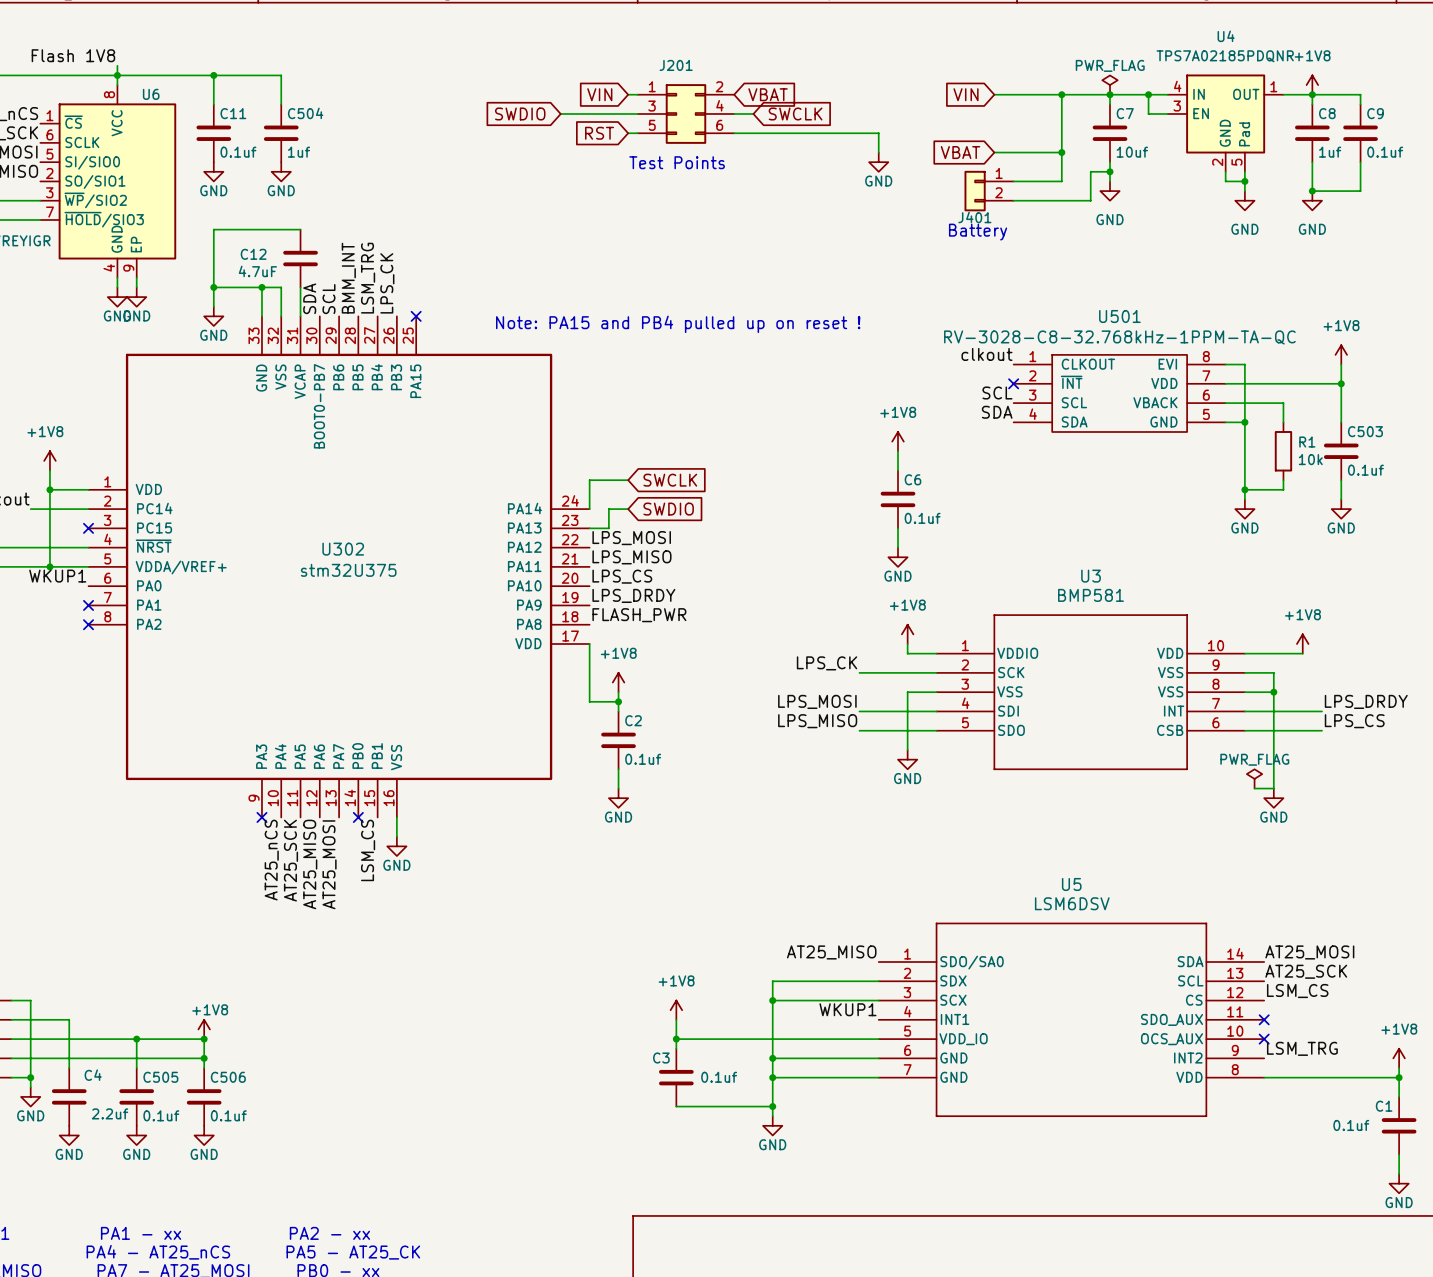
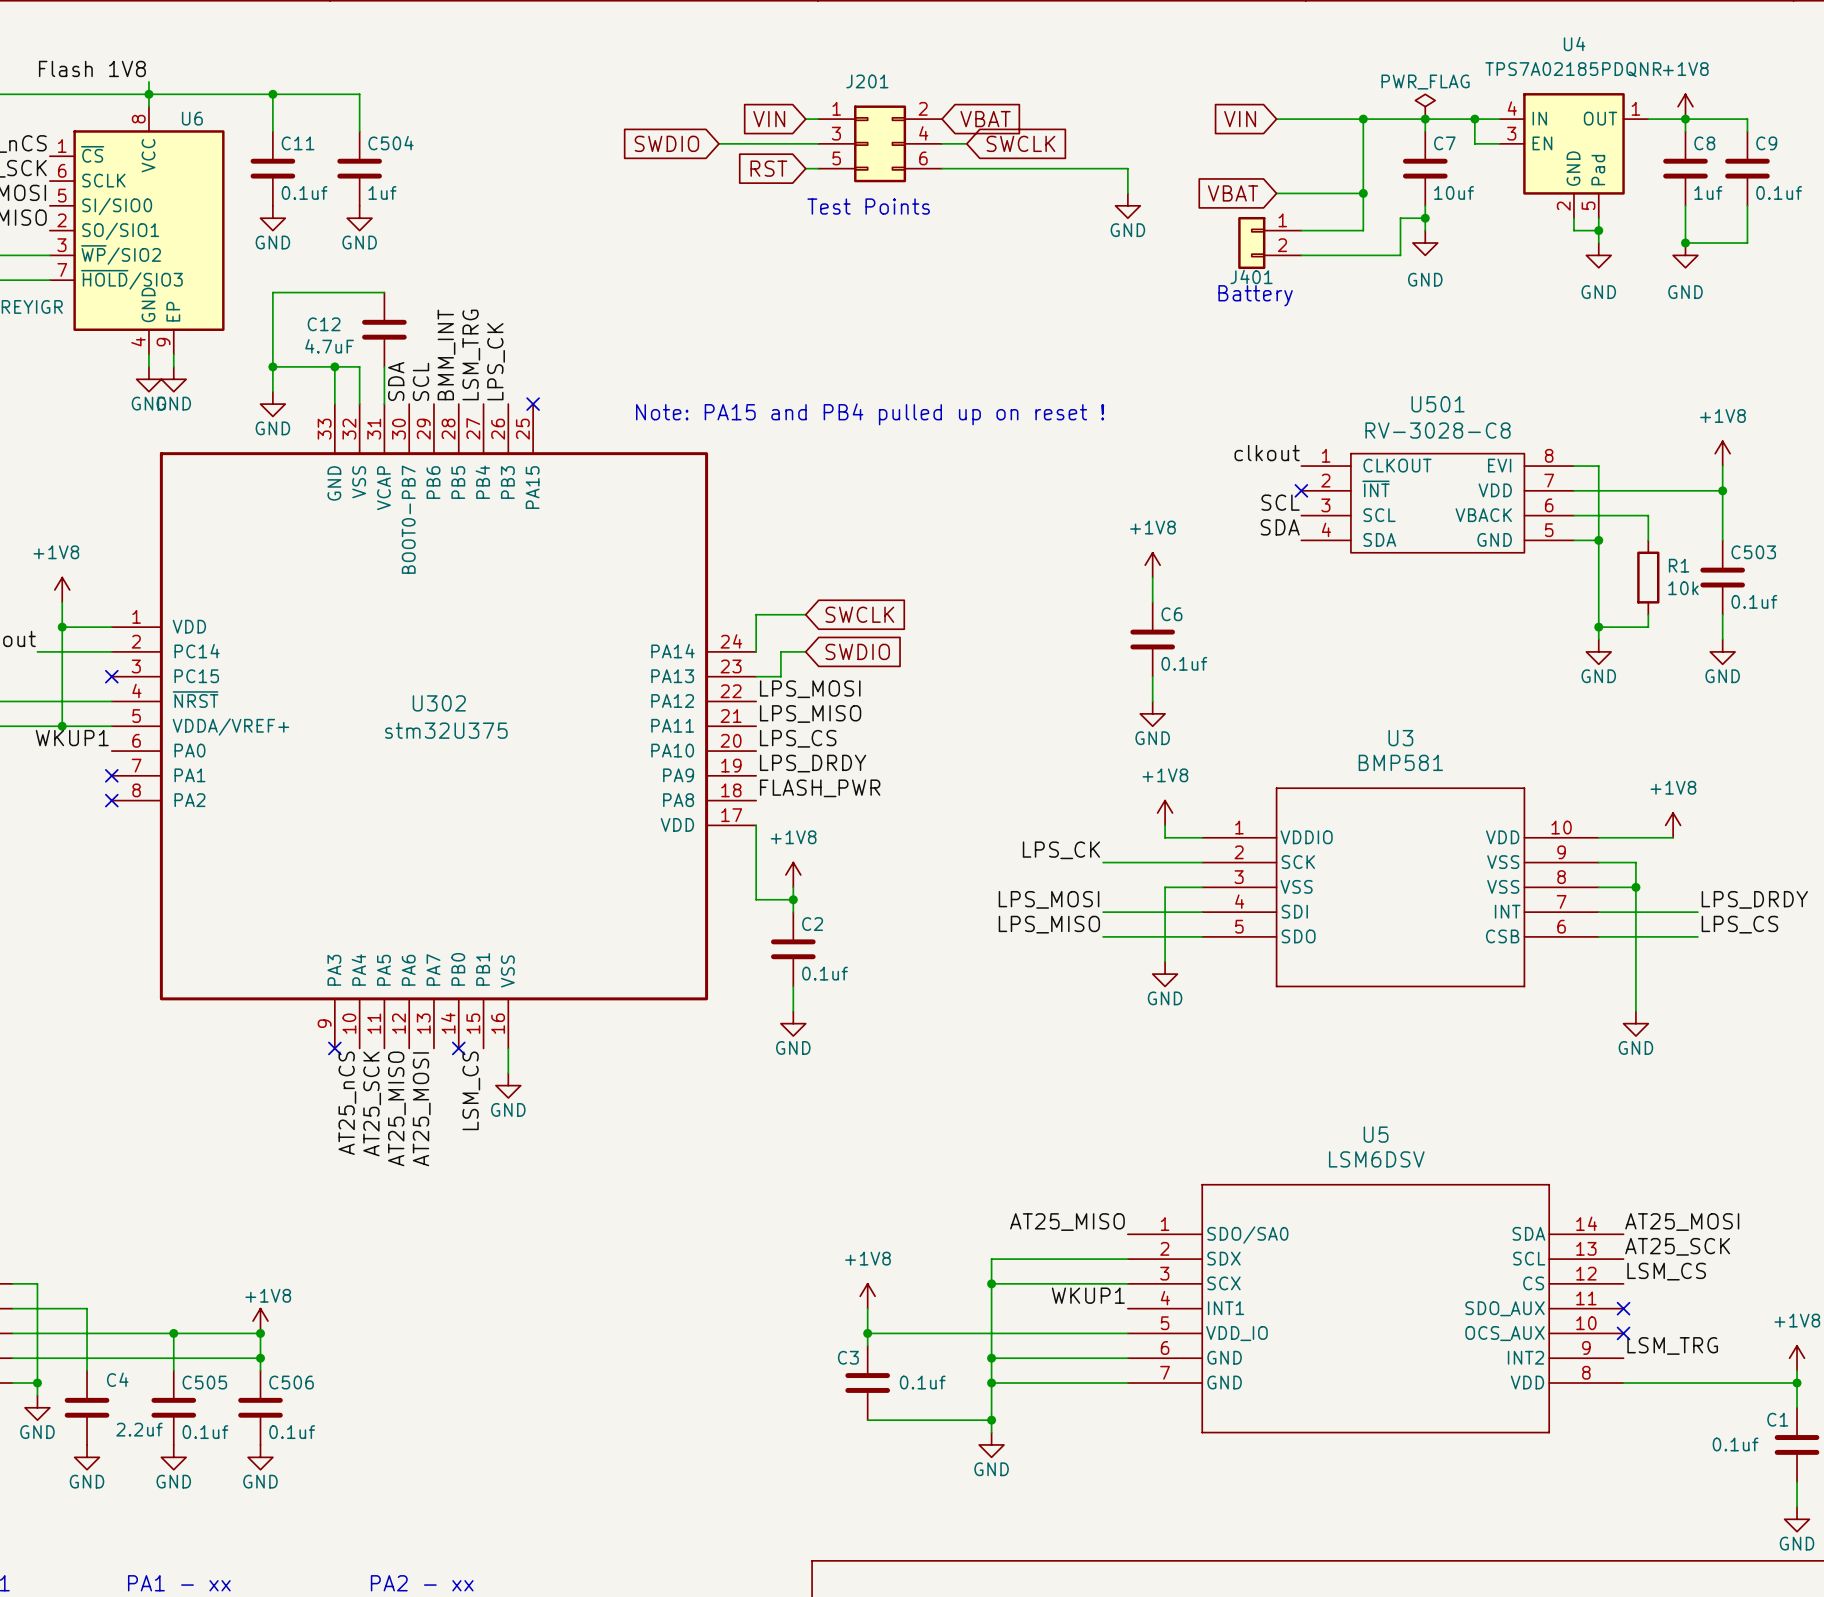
U501 value: RV-3028-C8-32.768kHz-1PPM-TA-QC (1119, 337) -> RV-3028-C8 (1438, 430)
power symbol: PWR_FLAG (1254, 778) -> none
wire: (1254, 788) (1273, 788) -> none

